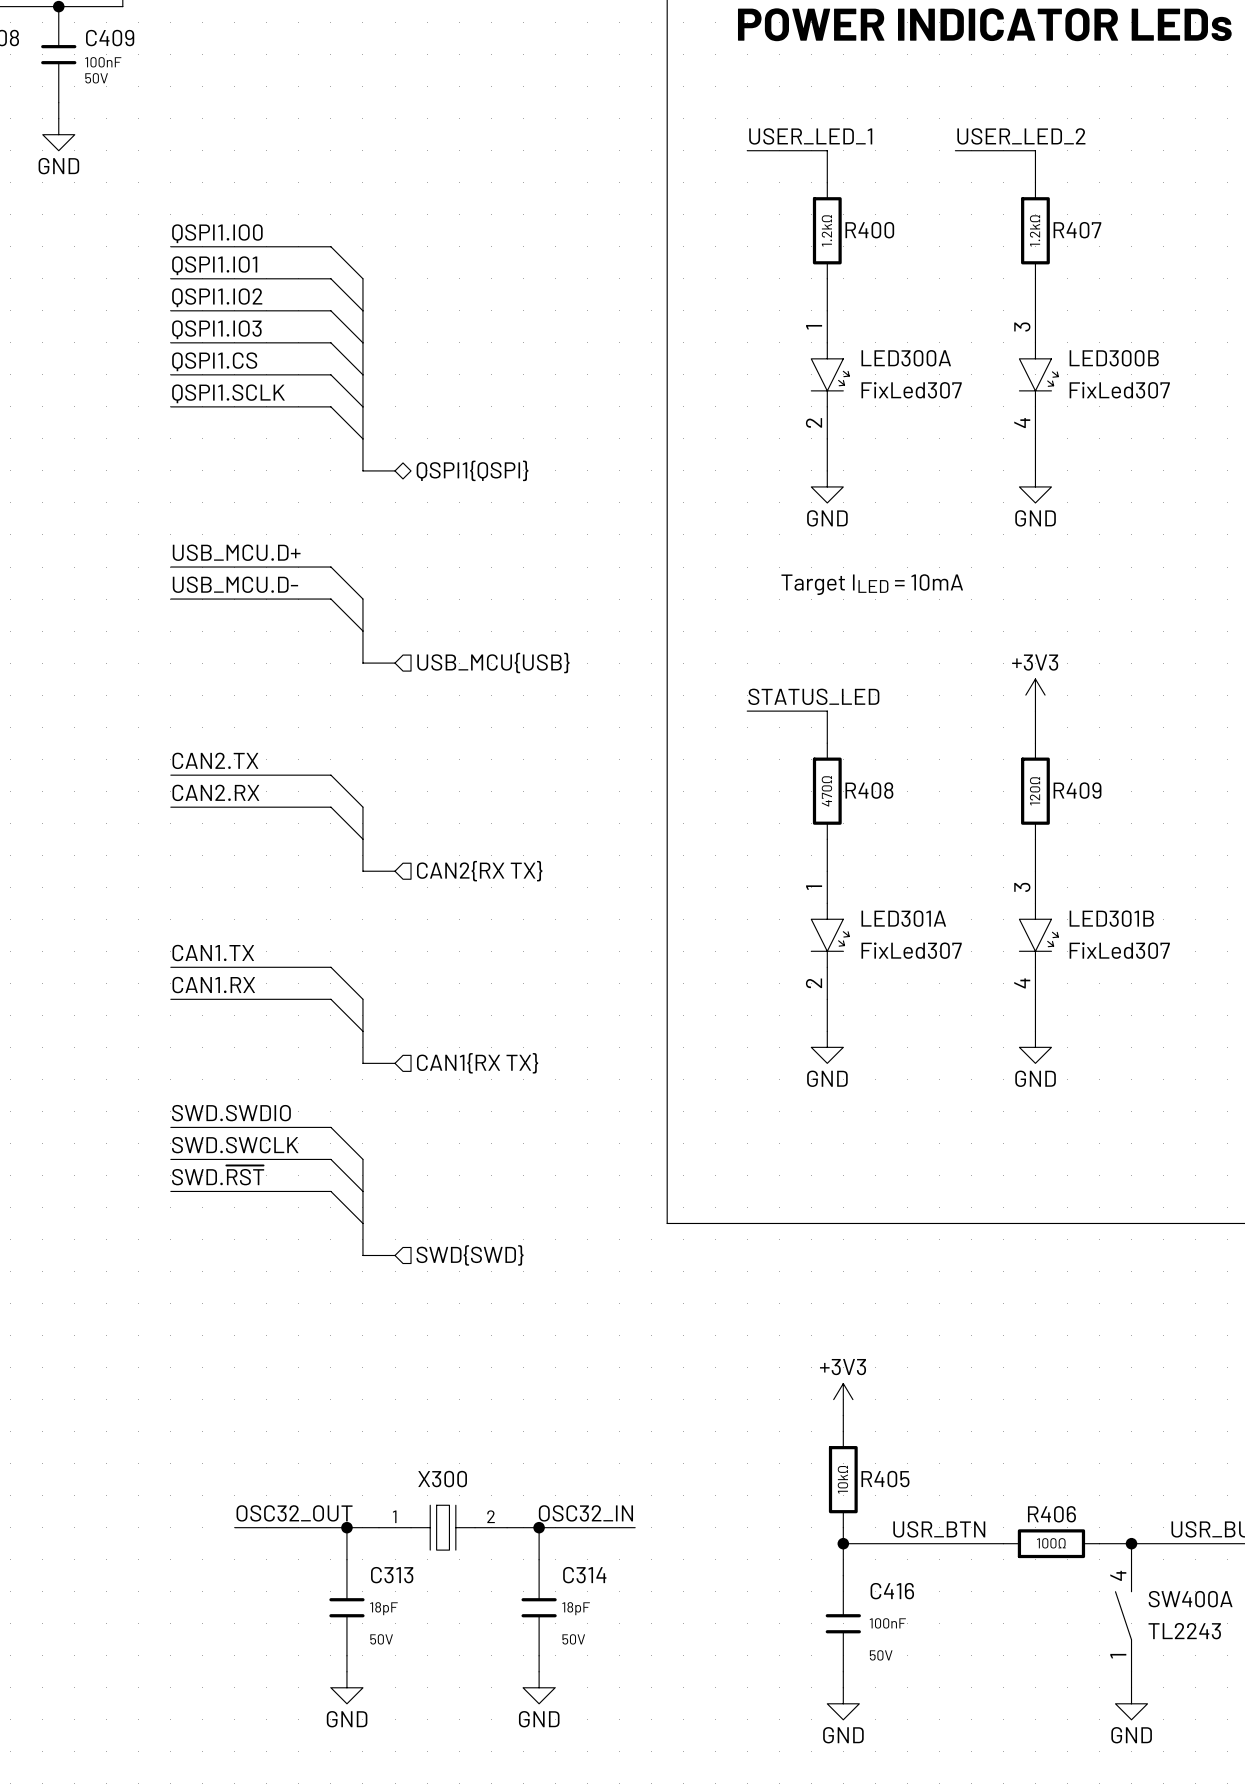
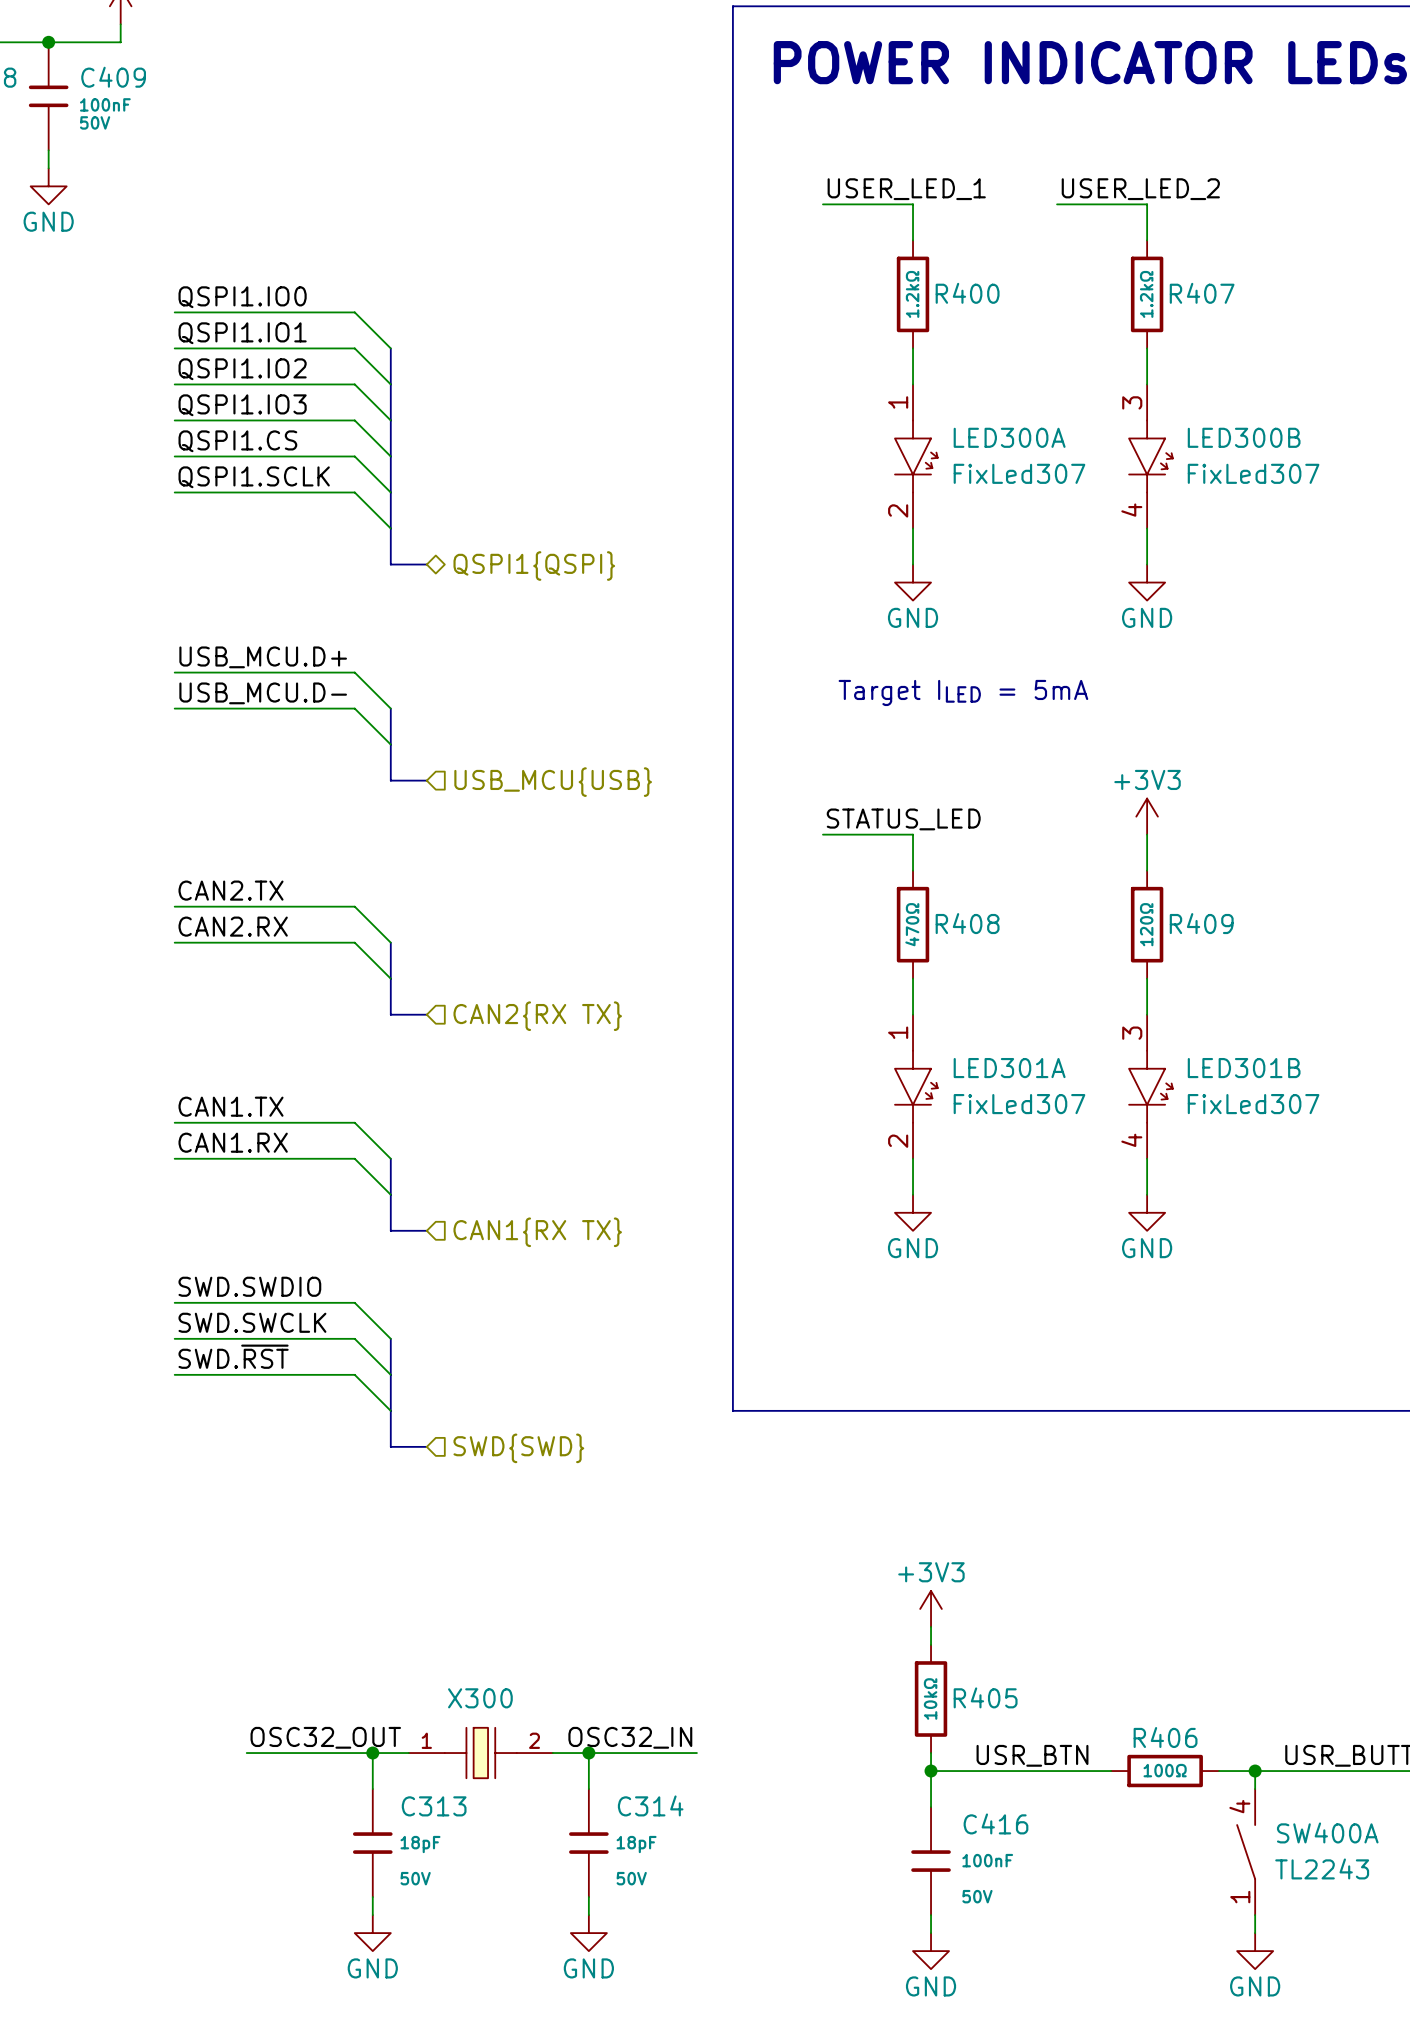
text: Target ILED = 10mA (872, 584) -> Target ILED = 5mA (963, 692)

